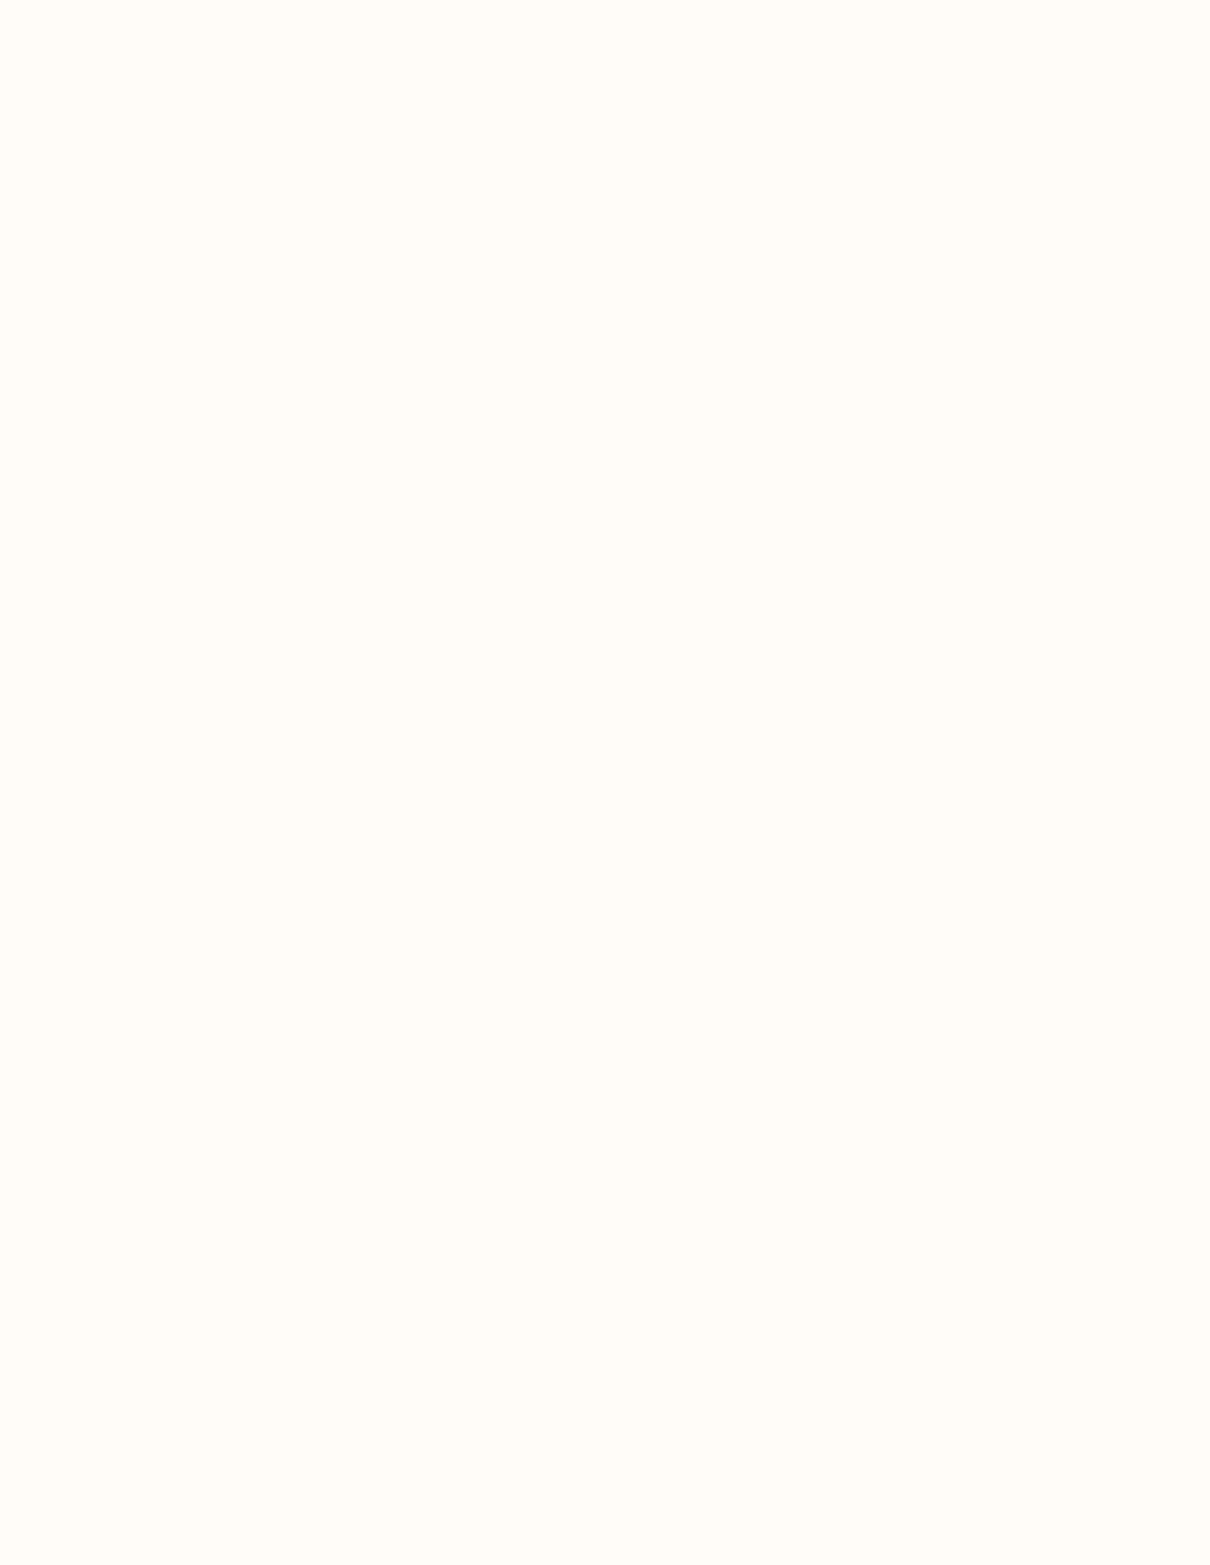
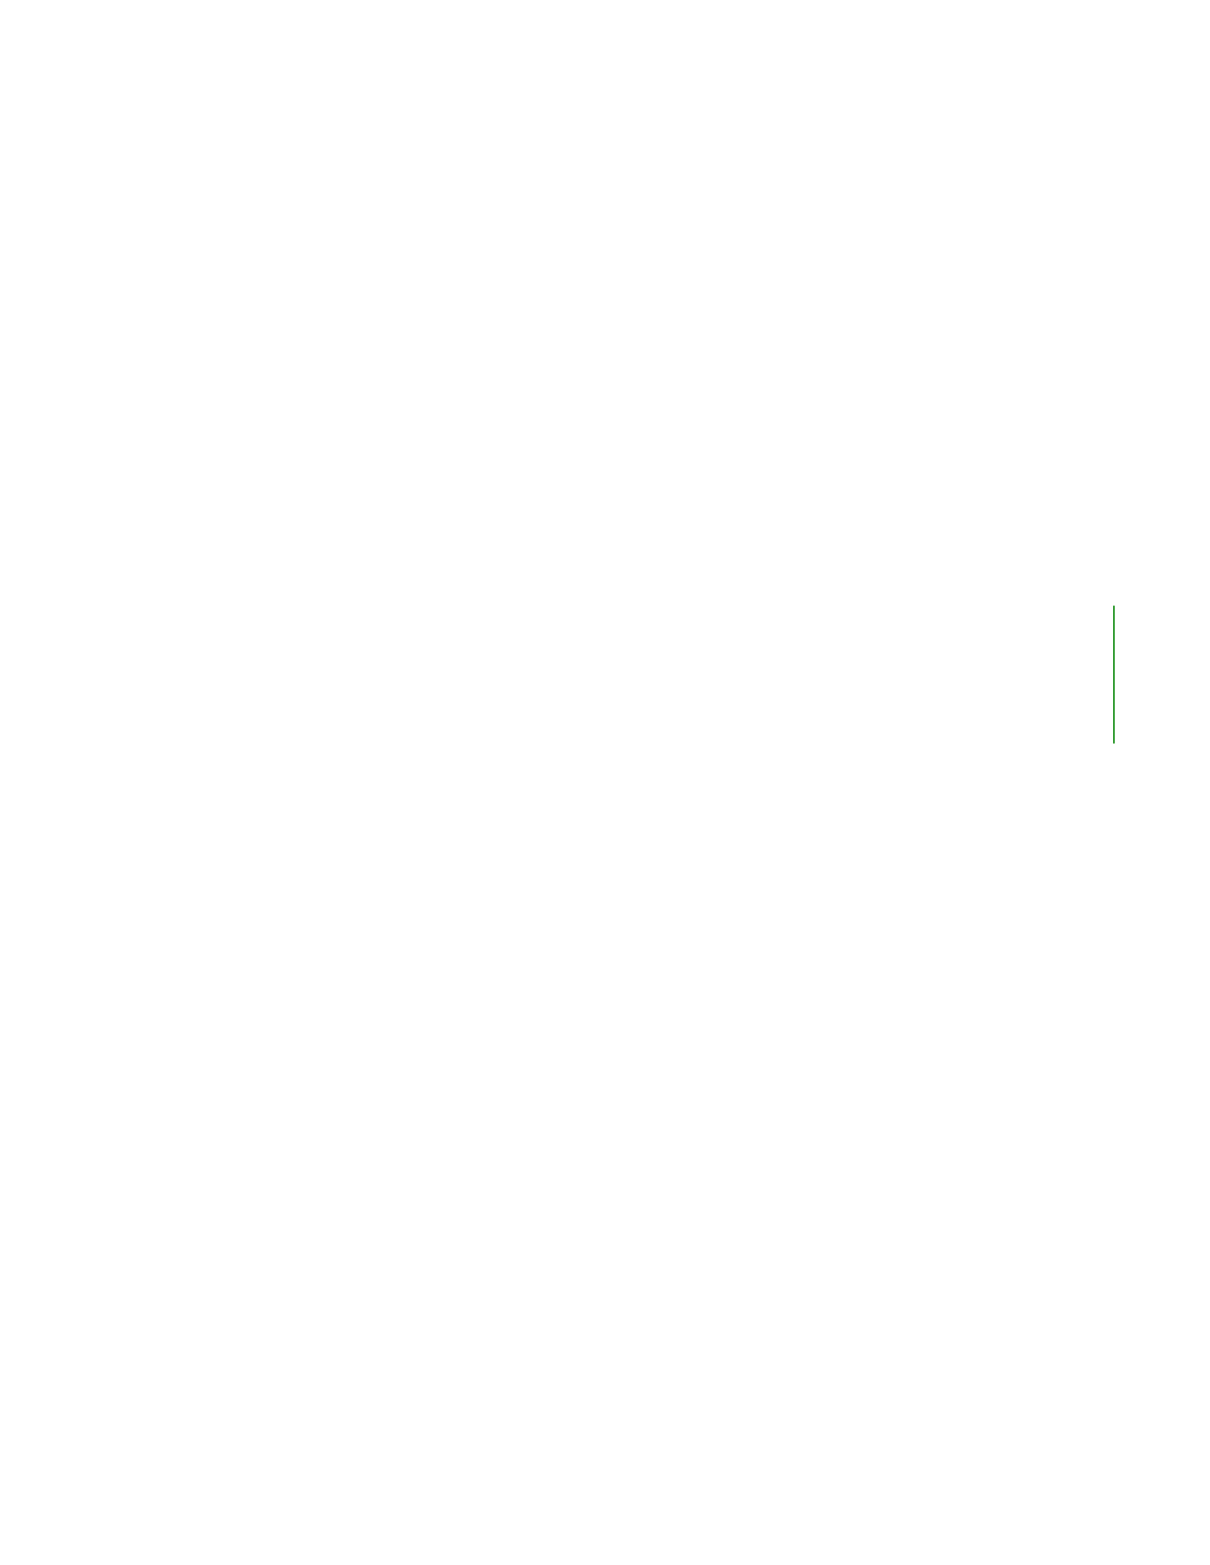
wire: none -> (1113, 606) (1113, 743)

